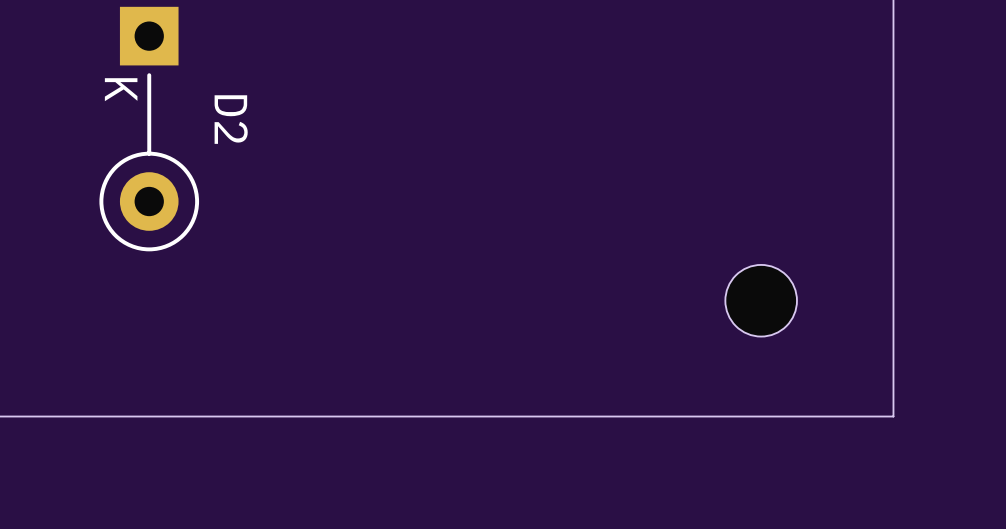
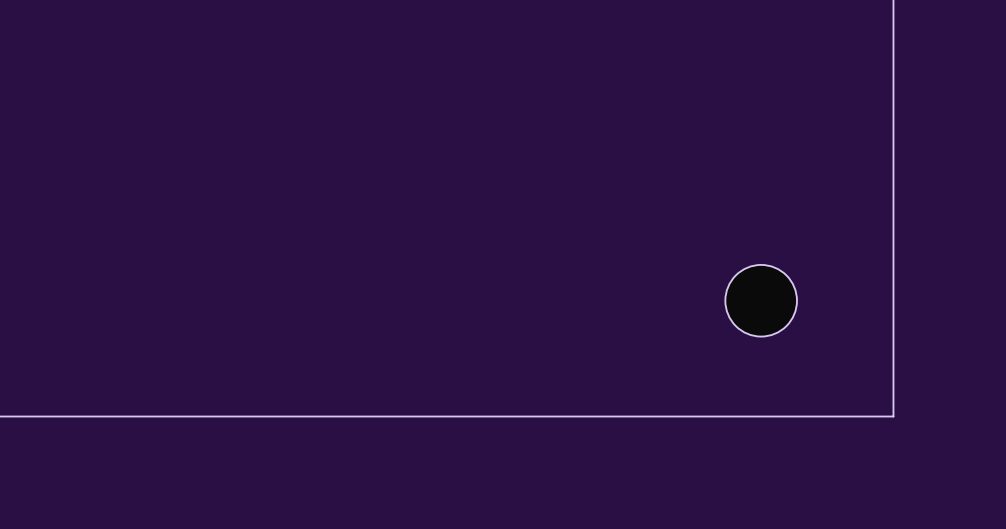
D2: (149, 129) -> none

